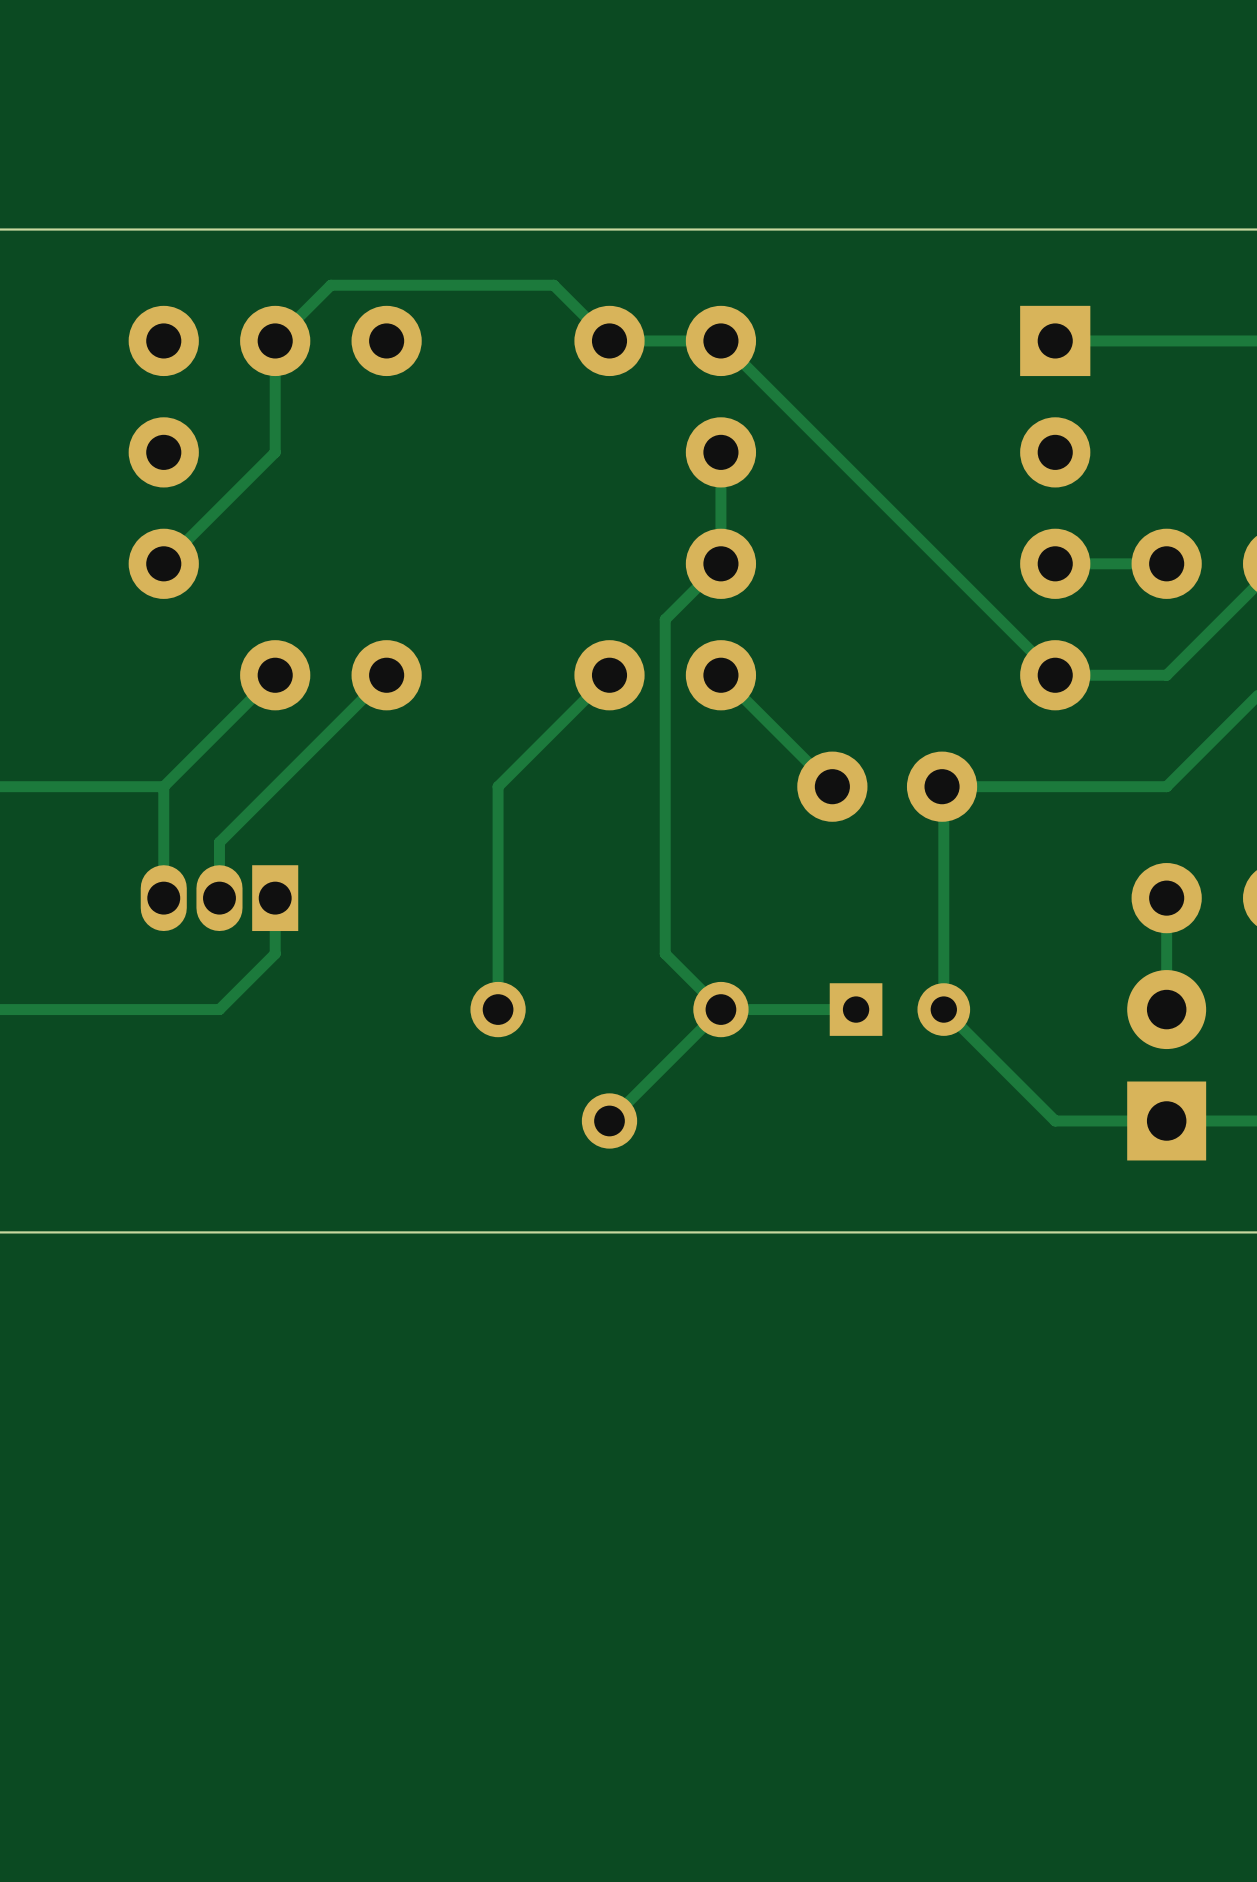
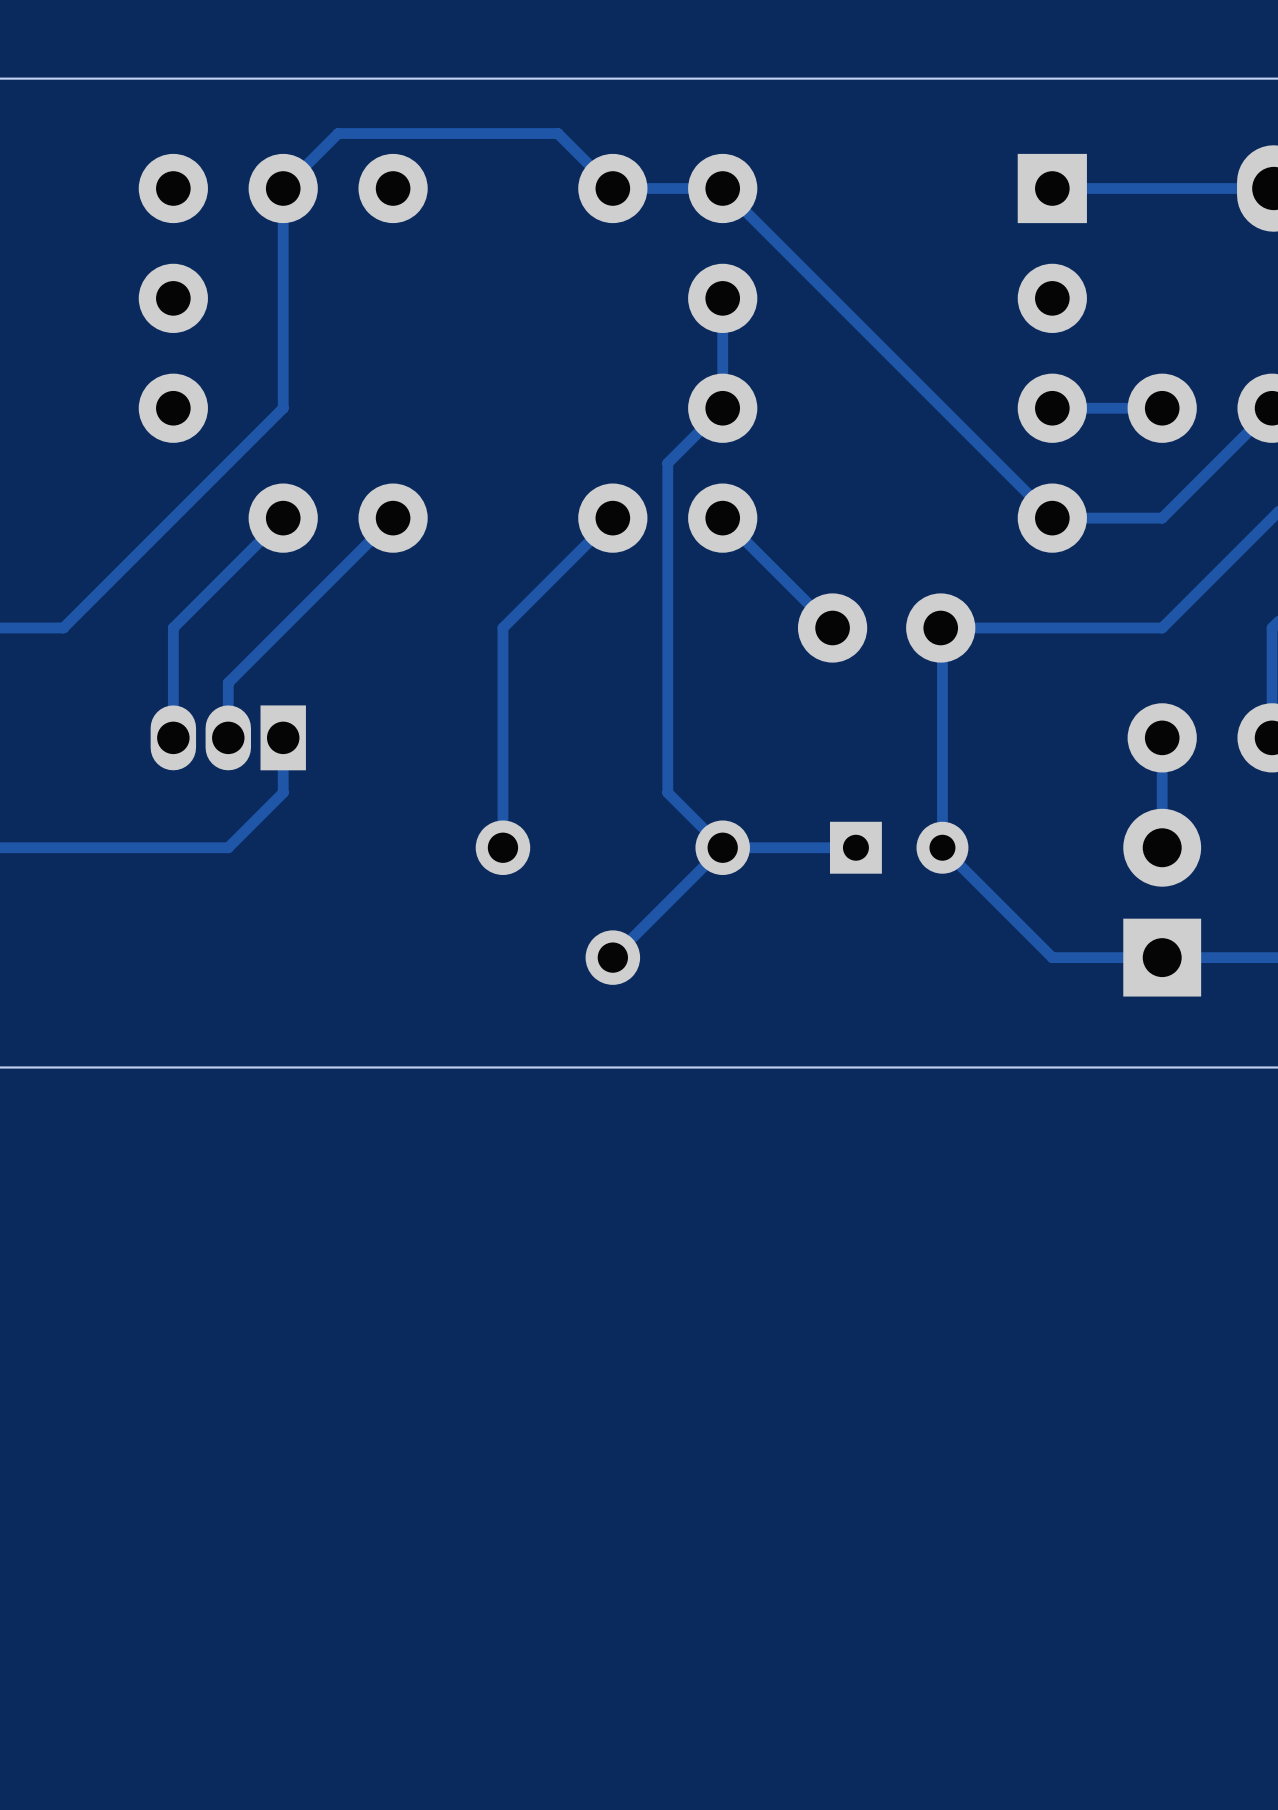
track: (275, 452) (163, 563) -> (283, 298) (283, 408) (63, 627)
track: (163, 786) (52, 786) -> none

